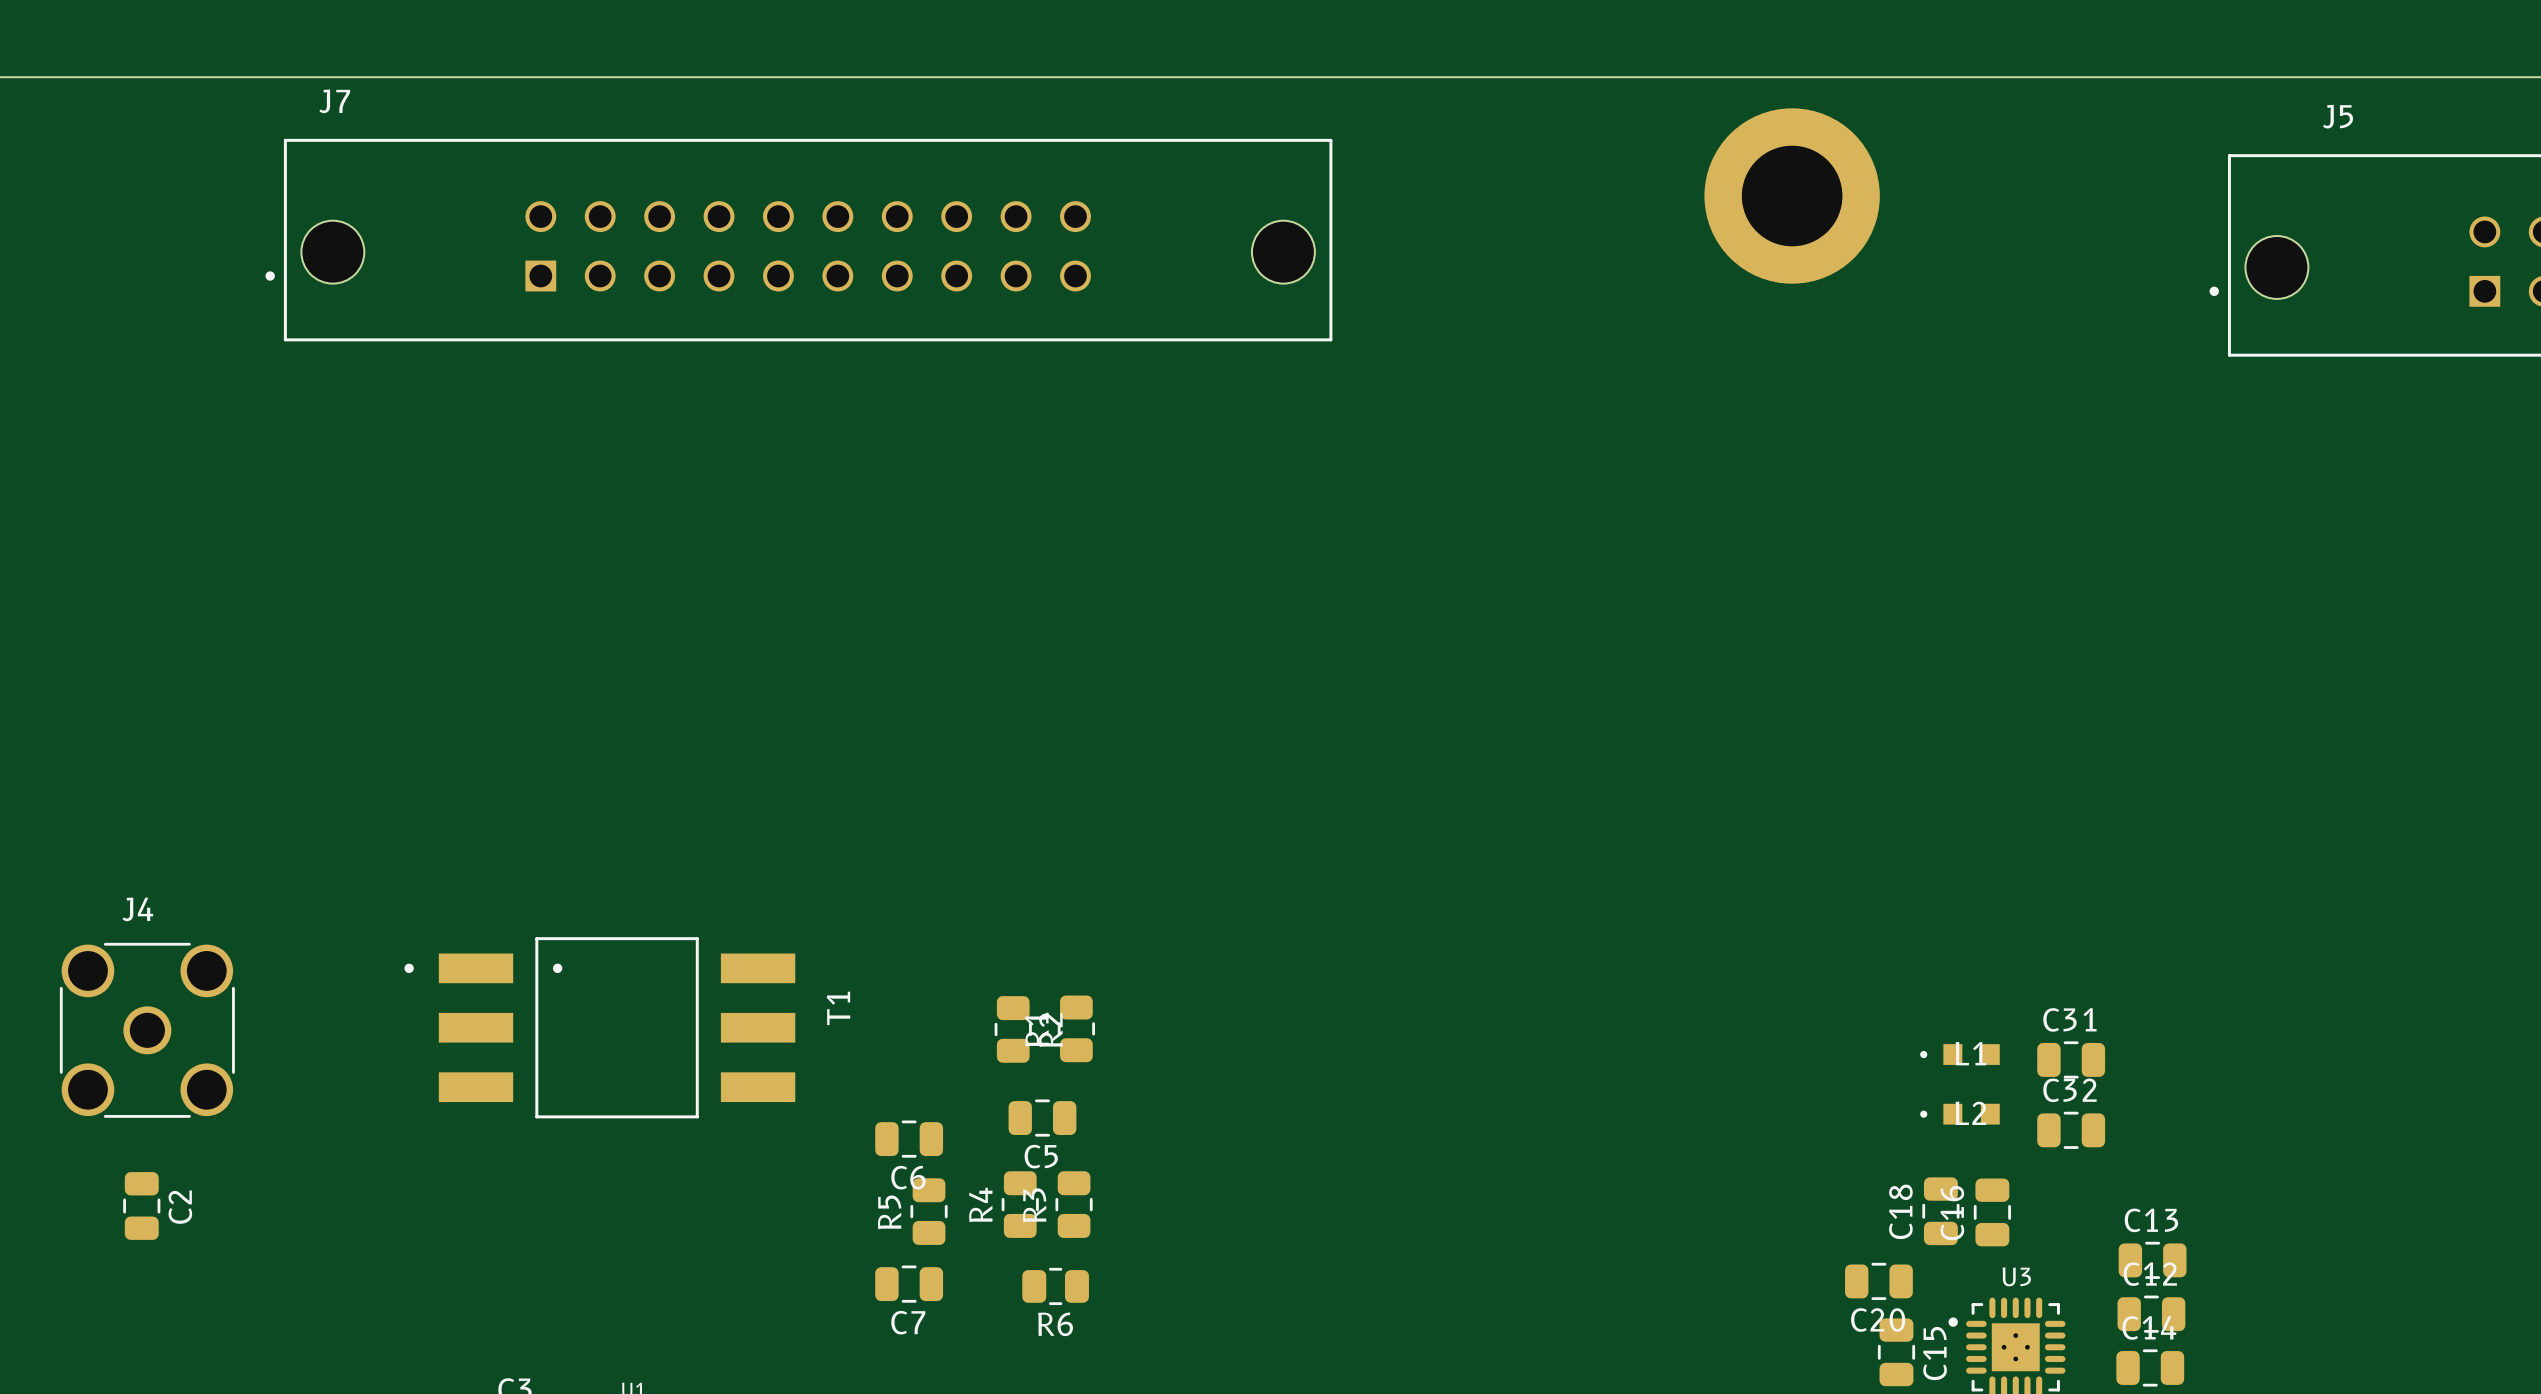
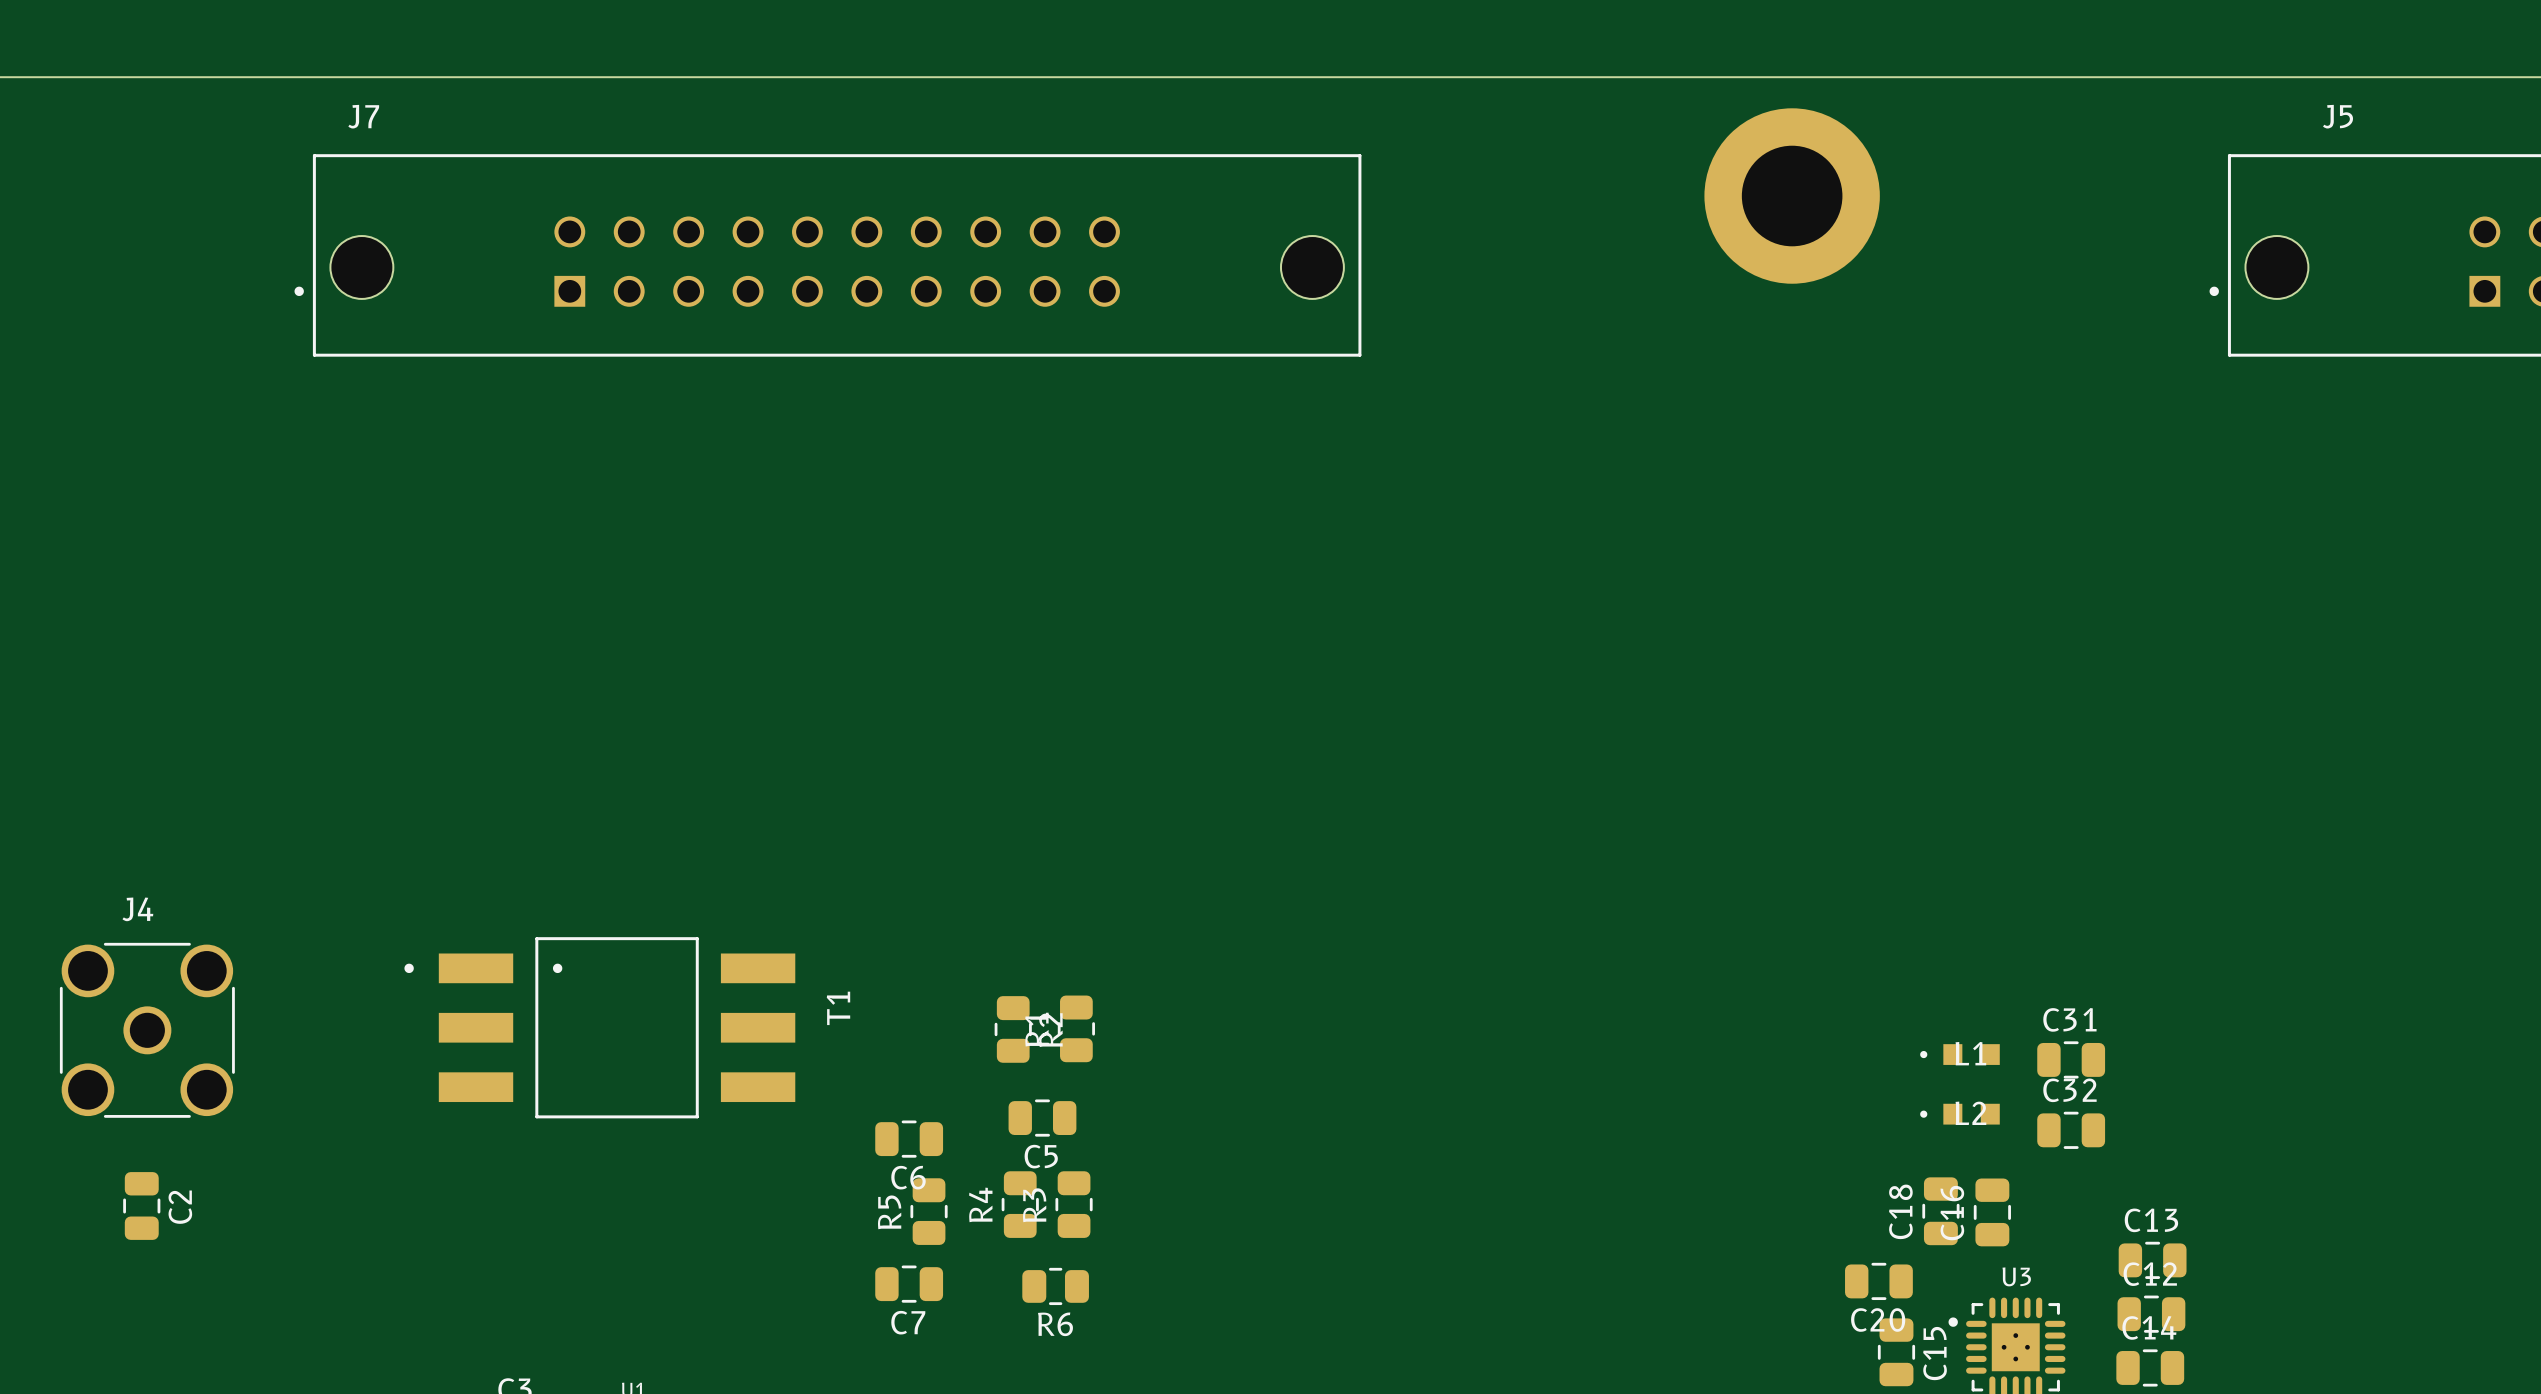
J7 position: (798, 240) -> (827, 255)

